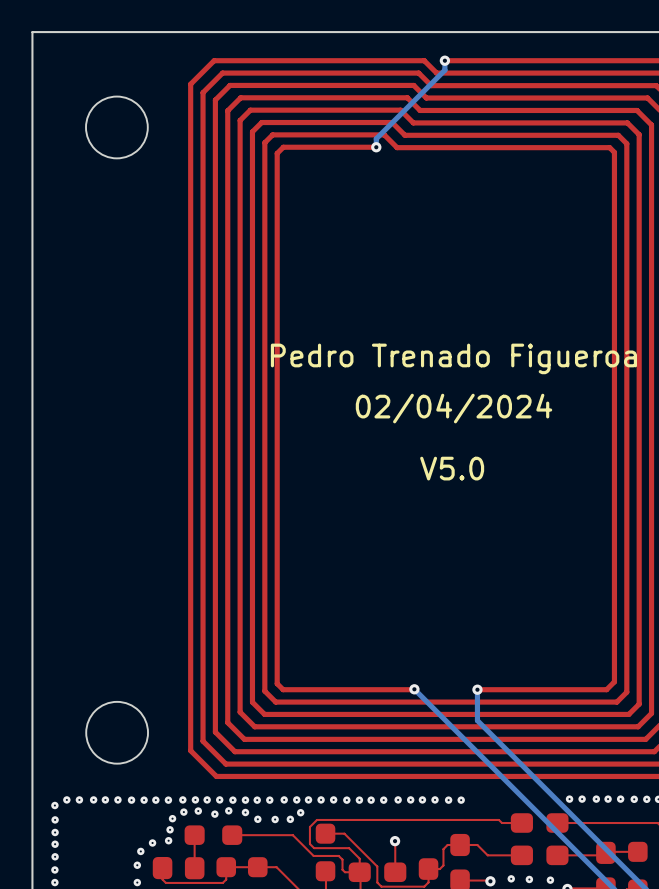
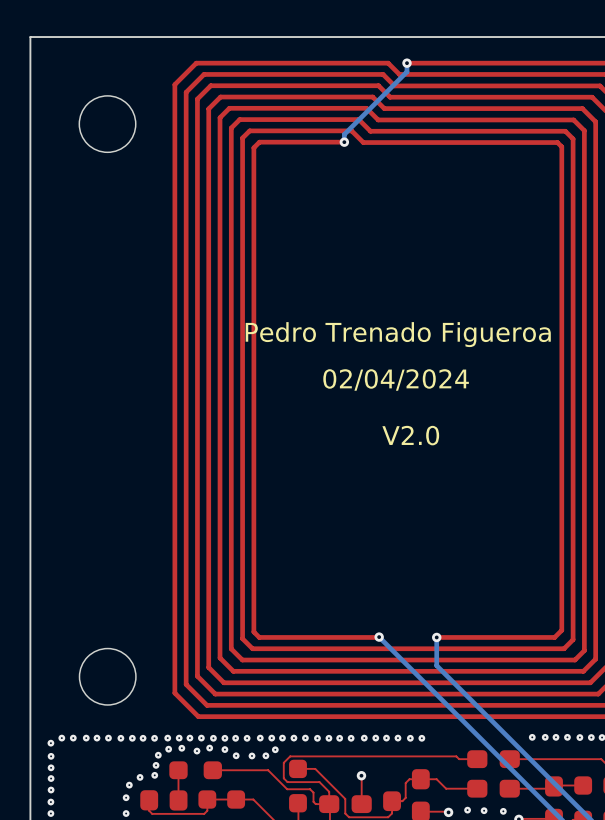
text: V5.0 (452, 468) -> V2.0 (410, 435)
via: (569, 799) -> none

